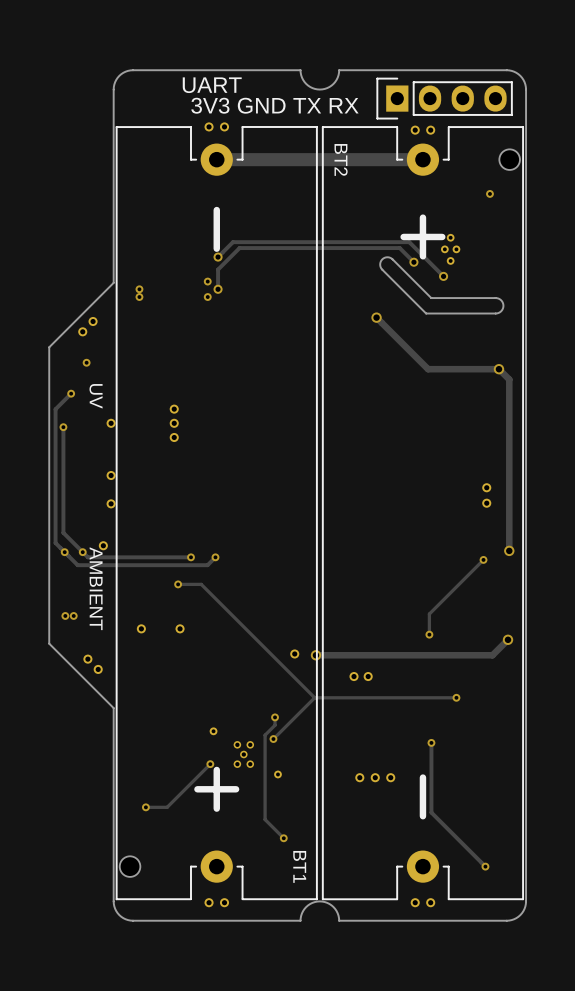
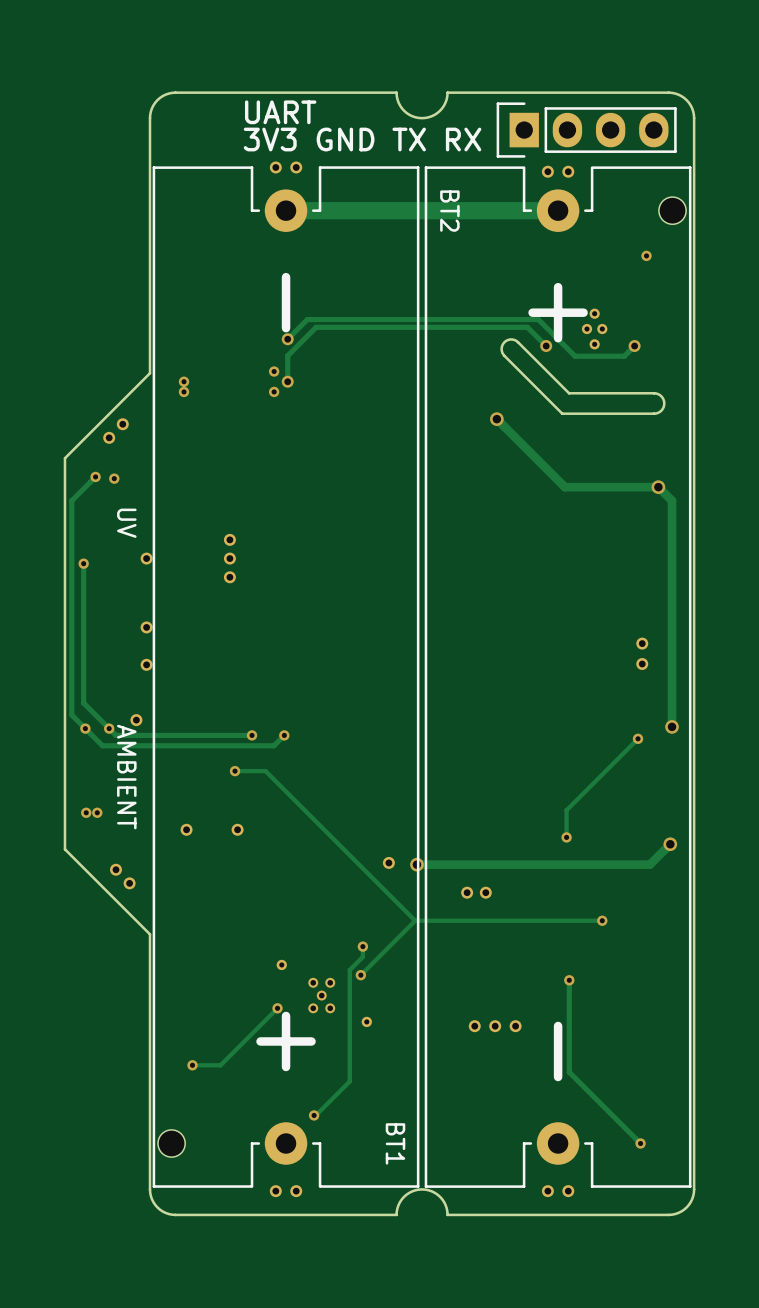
track: (408, 242) (443, 276) -> (538, 319) (575, 356) (624, 356) (634, 346)
via position: (443, 276) -> (634, 346)
track: (71, 393) (55, 409) (55, 543) -> (95, 476) (71, 500) (71, 715) (73, 716)
via position: (71, 393) -> (95, 476)
track: (265, 819) (283, 838) -> (349, 1081) (314, 1115)
via position: (283, 838) -> (314, 1115)

